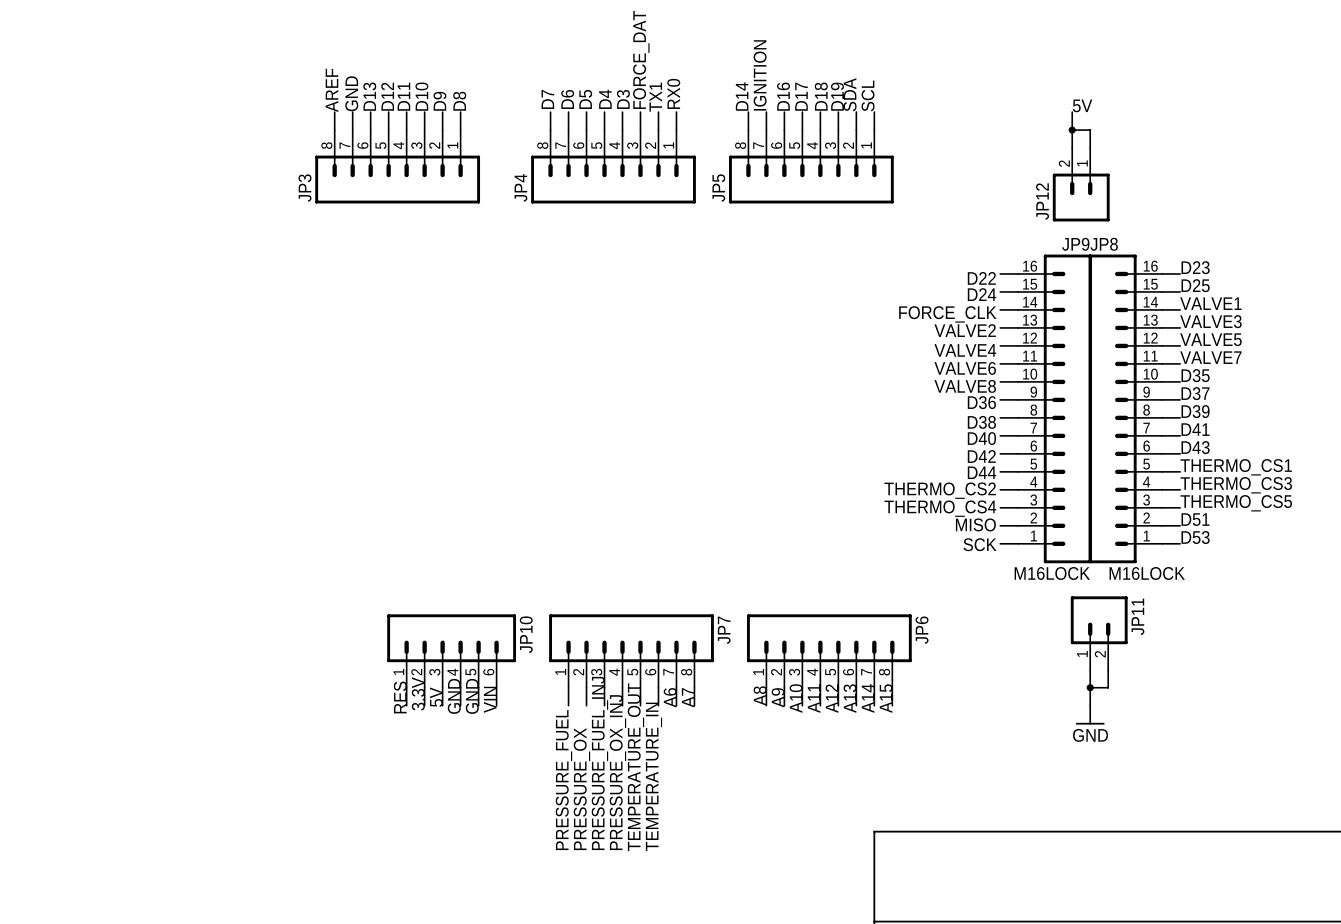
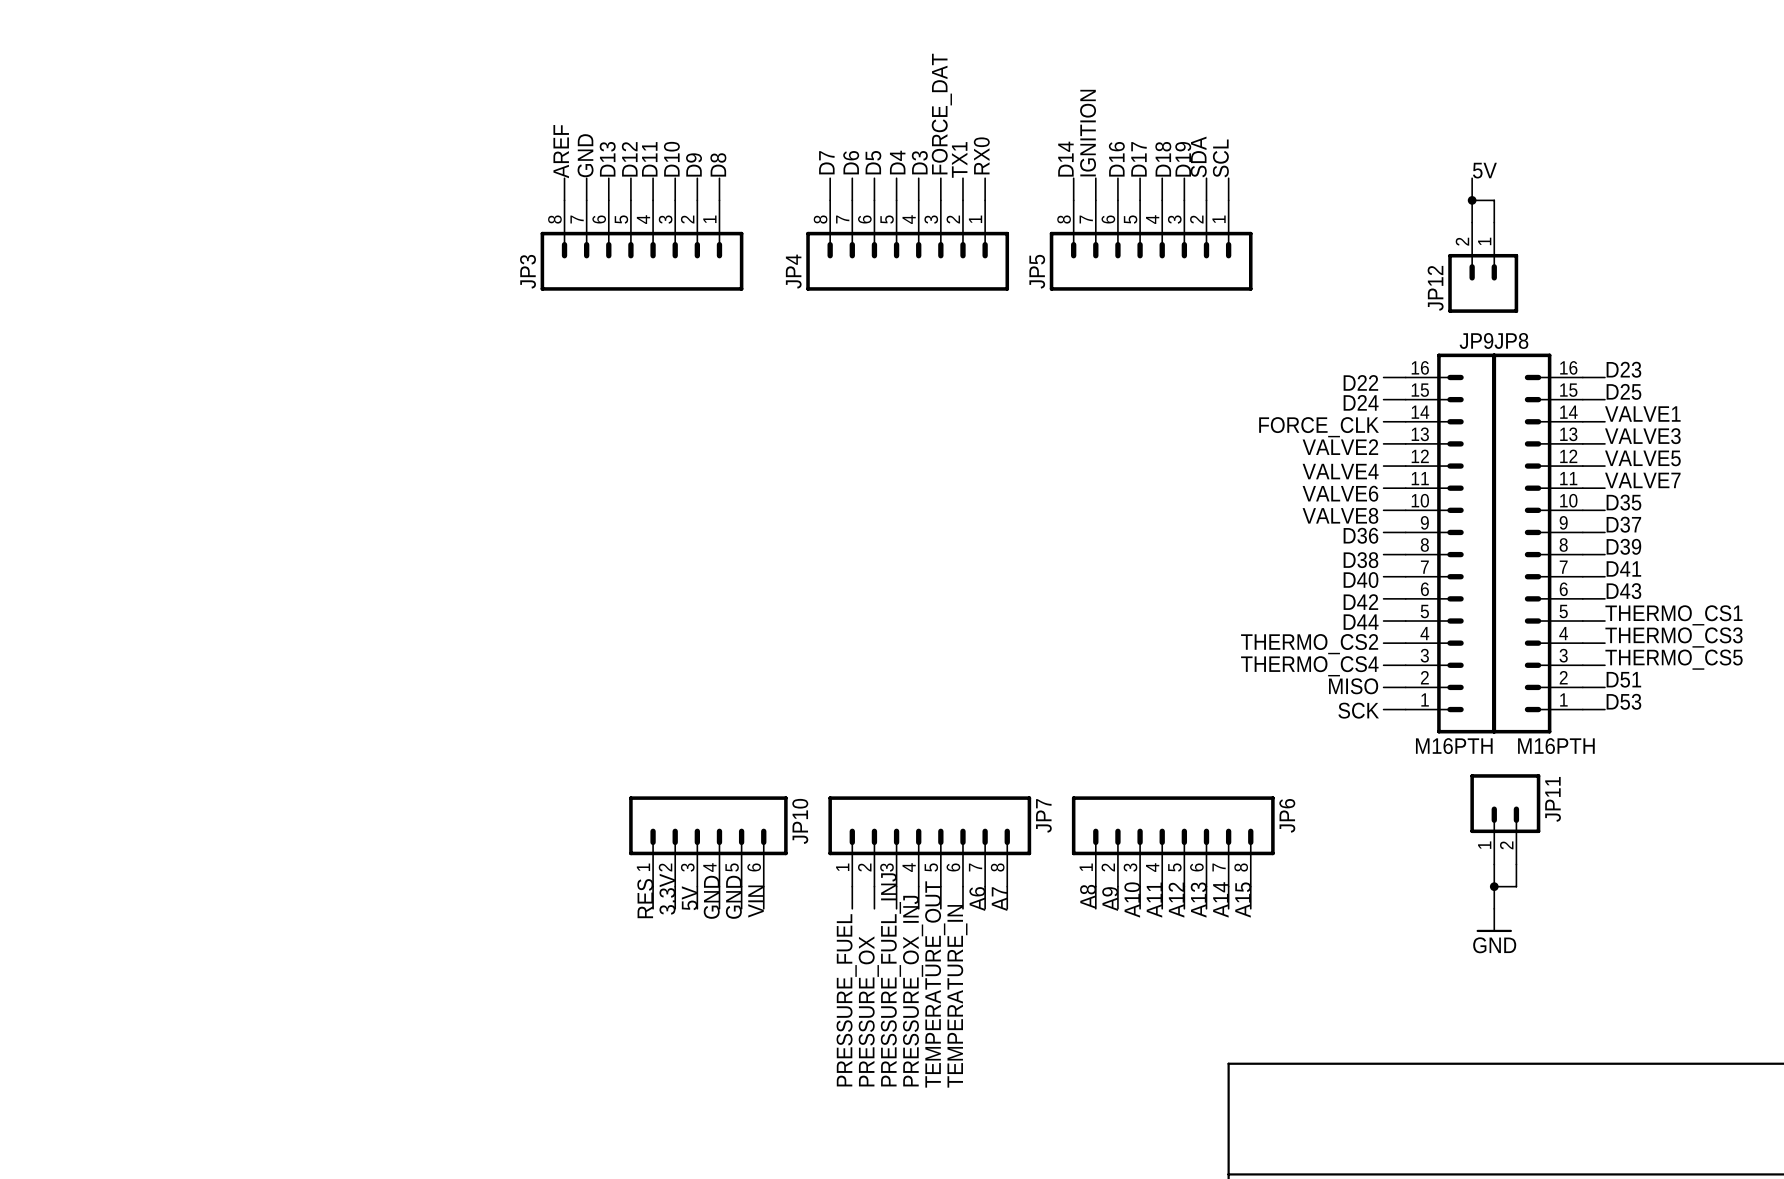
JP9 value: M16LOCK (1052, 573) -> M16PTH (1454, 746)
JP8 value: M16LOCK (1147, 573) -> M16PTH (1556, 746)

